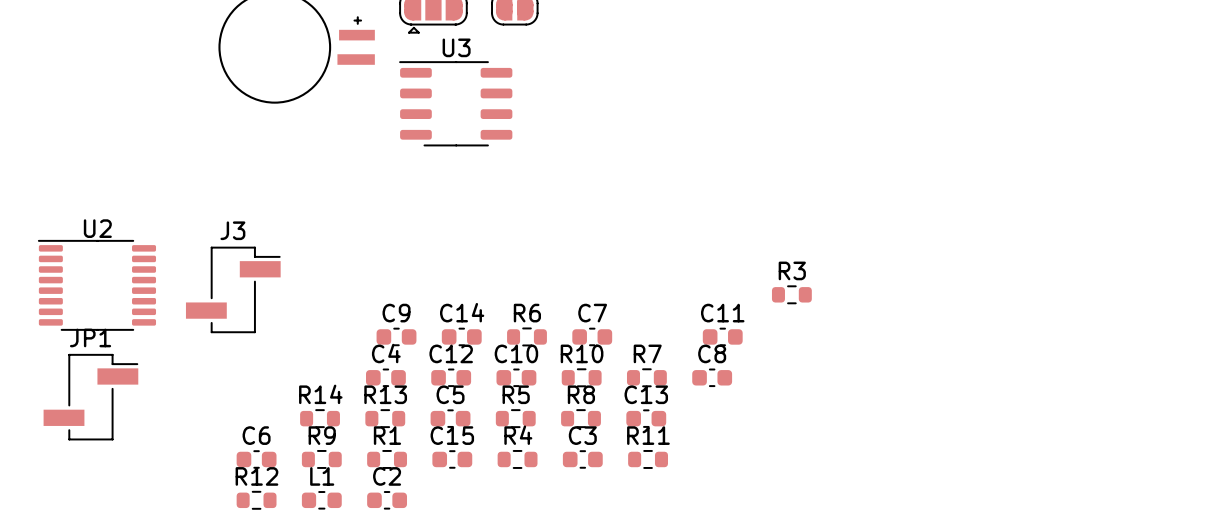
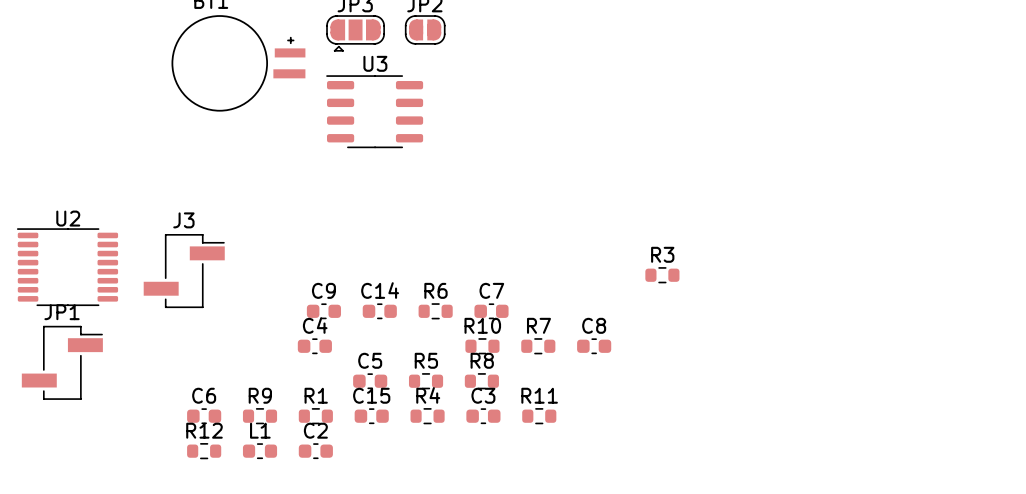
C11: (722, 336) -> none
C12: (451, 377) -> none
C10: (516, 377) -> none
R14: (320, 418) -> none
R13: (385, 418) -> none
C13: (646, 418) -> none

